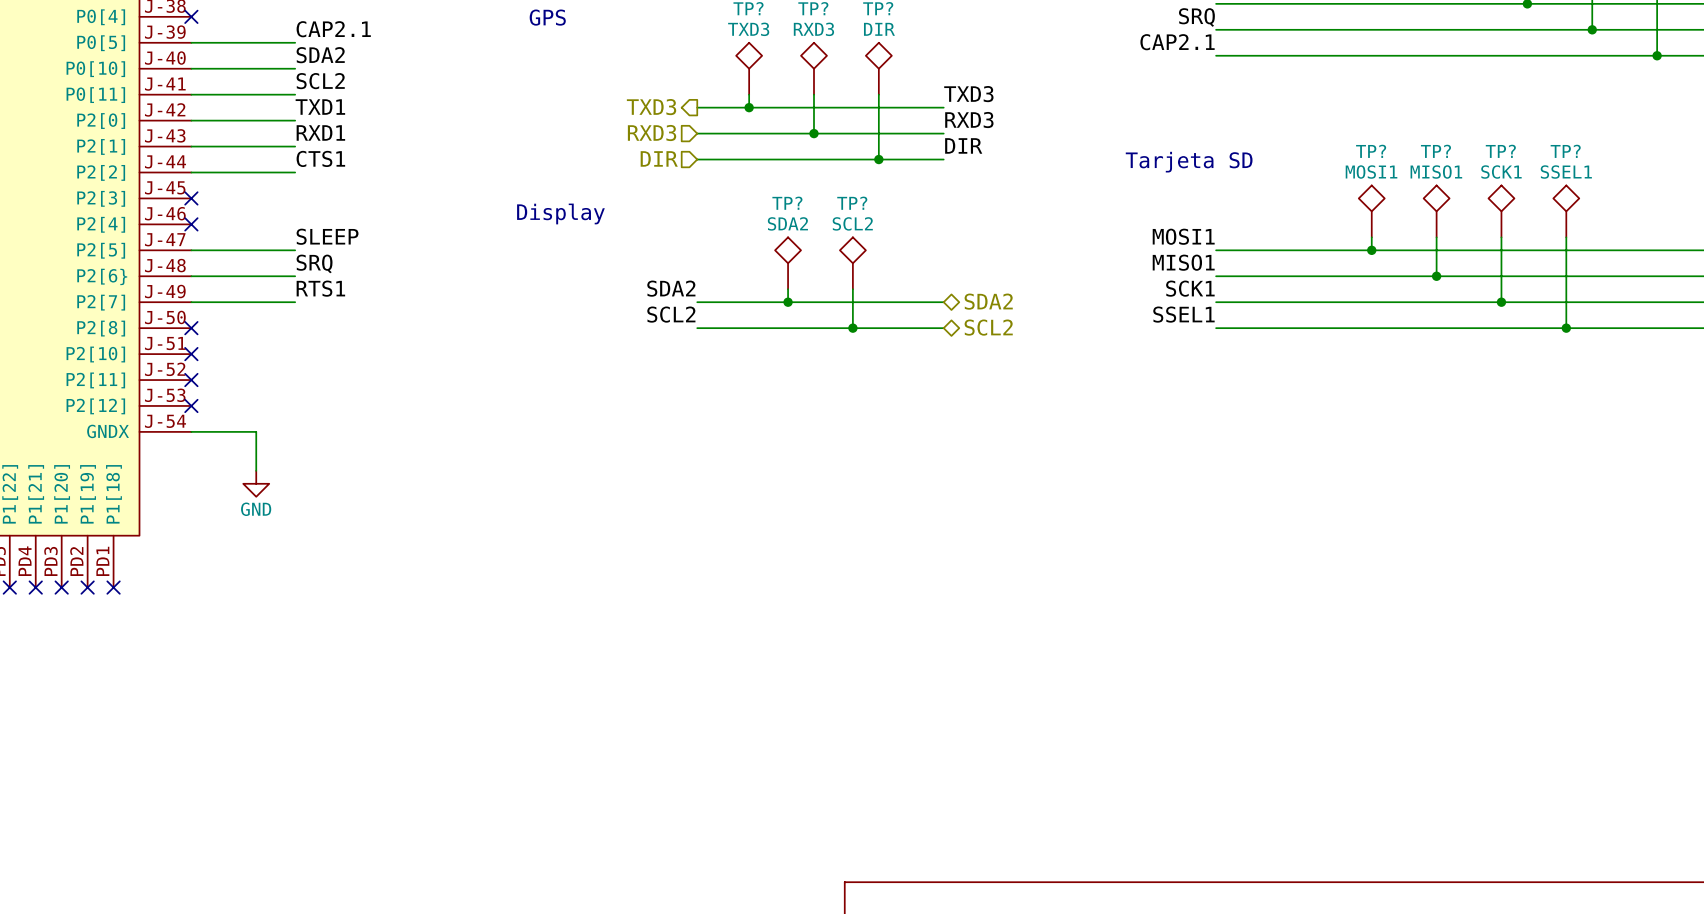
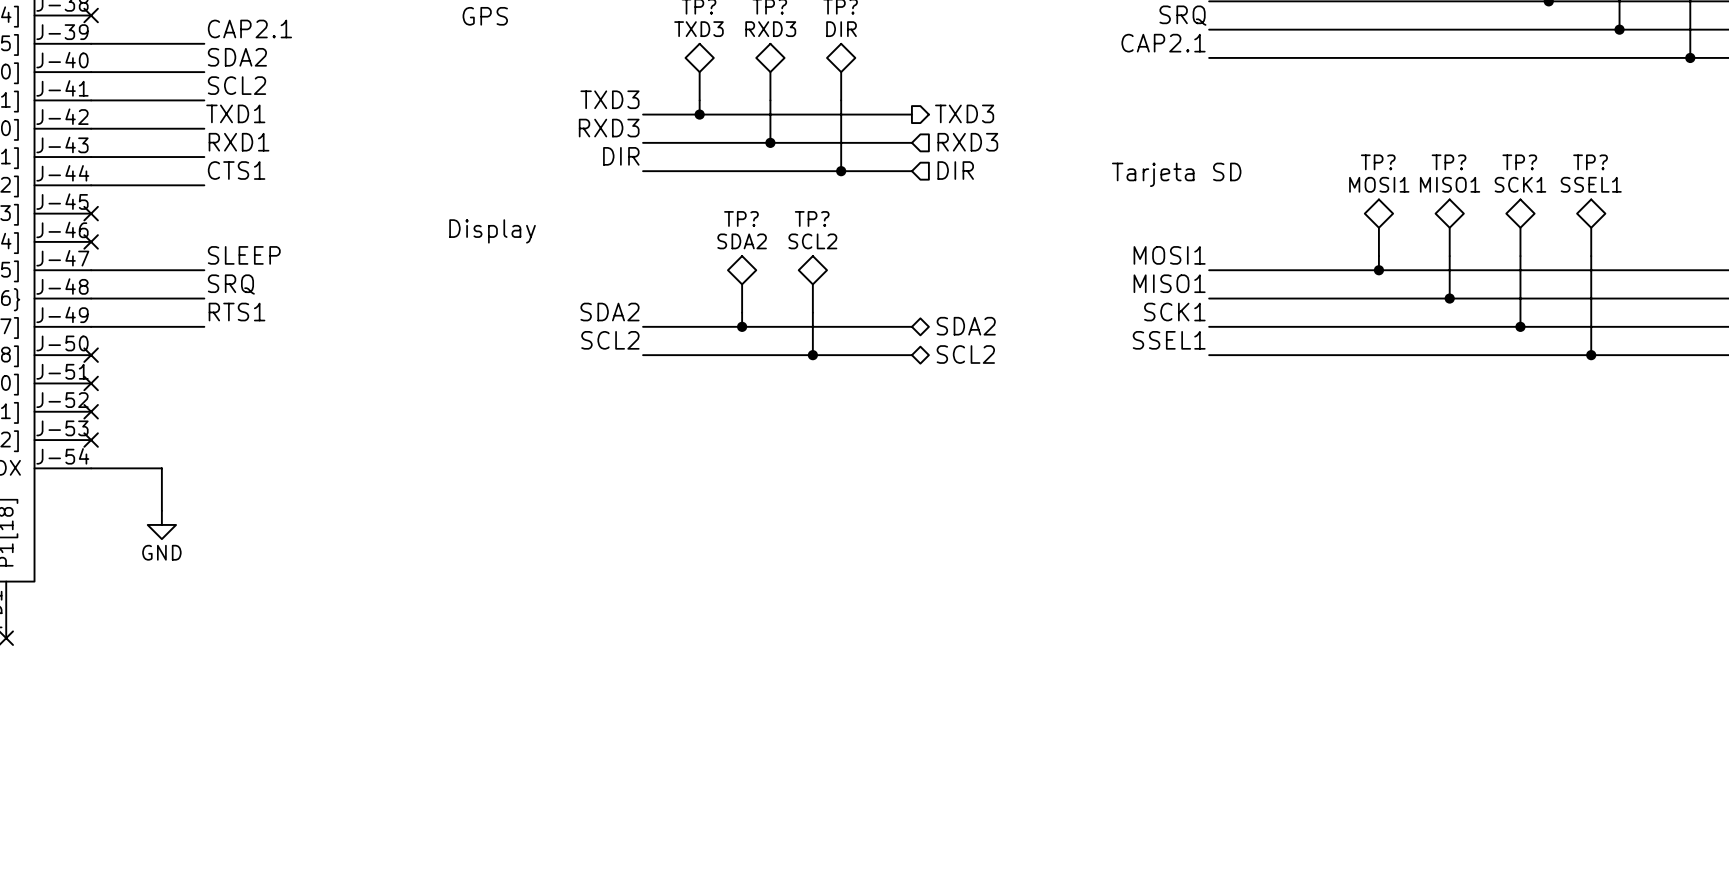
label position: TXD3 (968, 94) -> TXD3 (609, 99)
hierarchical label: TXD3 (651, 107) -> none
hierarchical label: none -> TXD3 (964, 113)
label position: RXD3 (969, 120) -> RXD3 (609, 128)
hierarchical label: RXD3 (652, 133) -> none
hierarchical label: none -> RXD3 (967, 142)
label position: DIR (963, 145) -> DIR (621, 156)
hierarchical label: DIR (659, 158) -> none
hierarchical label: none -> DIR (955, 170)

